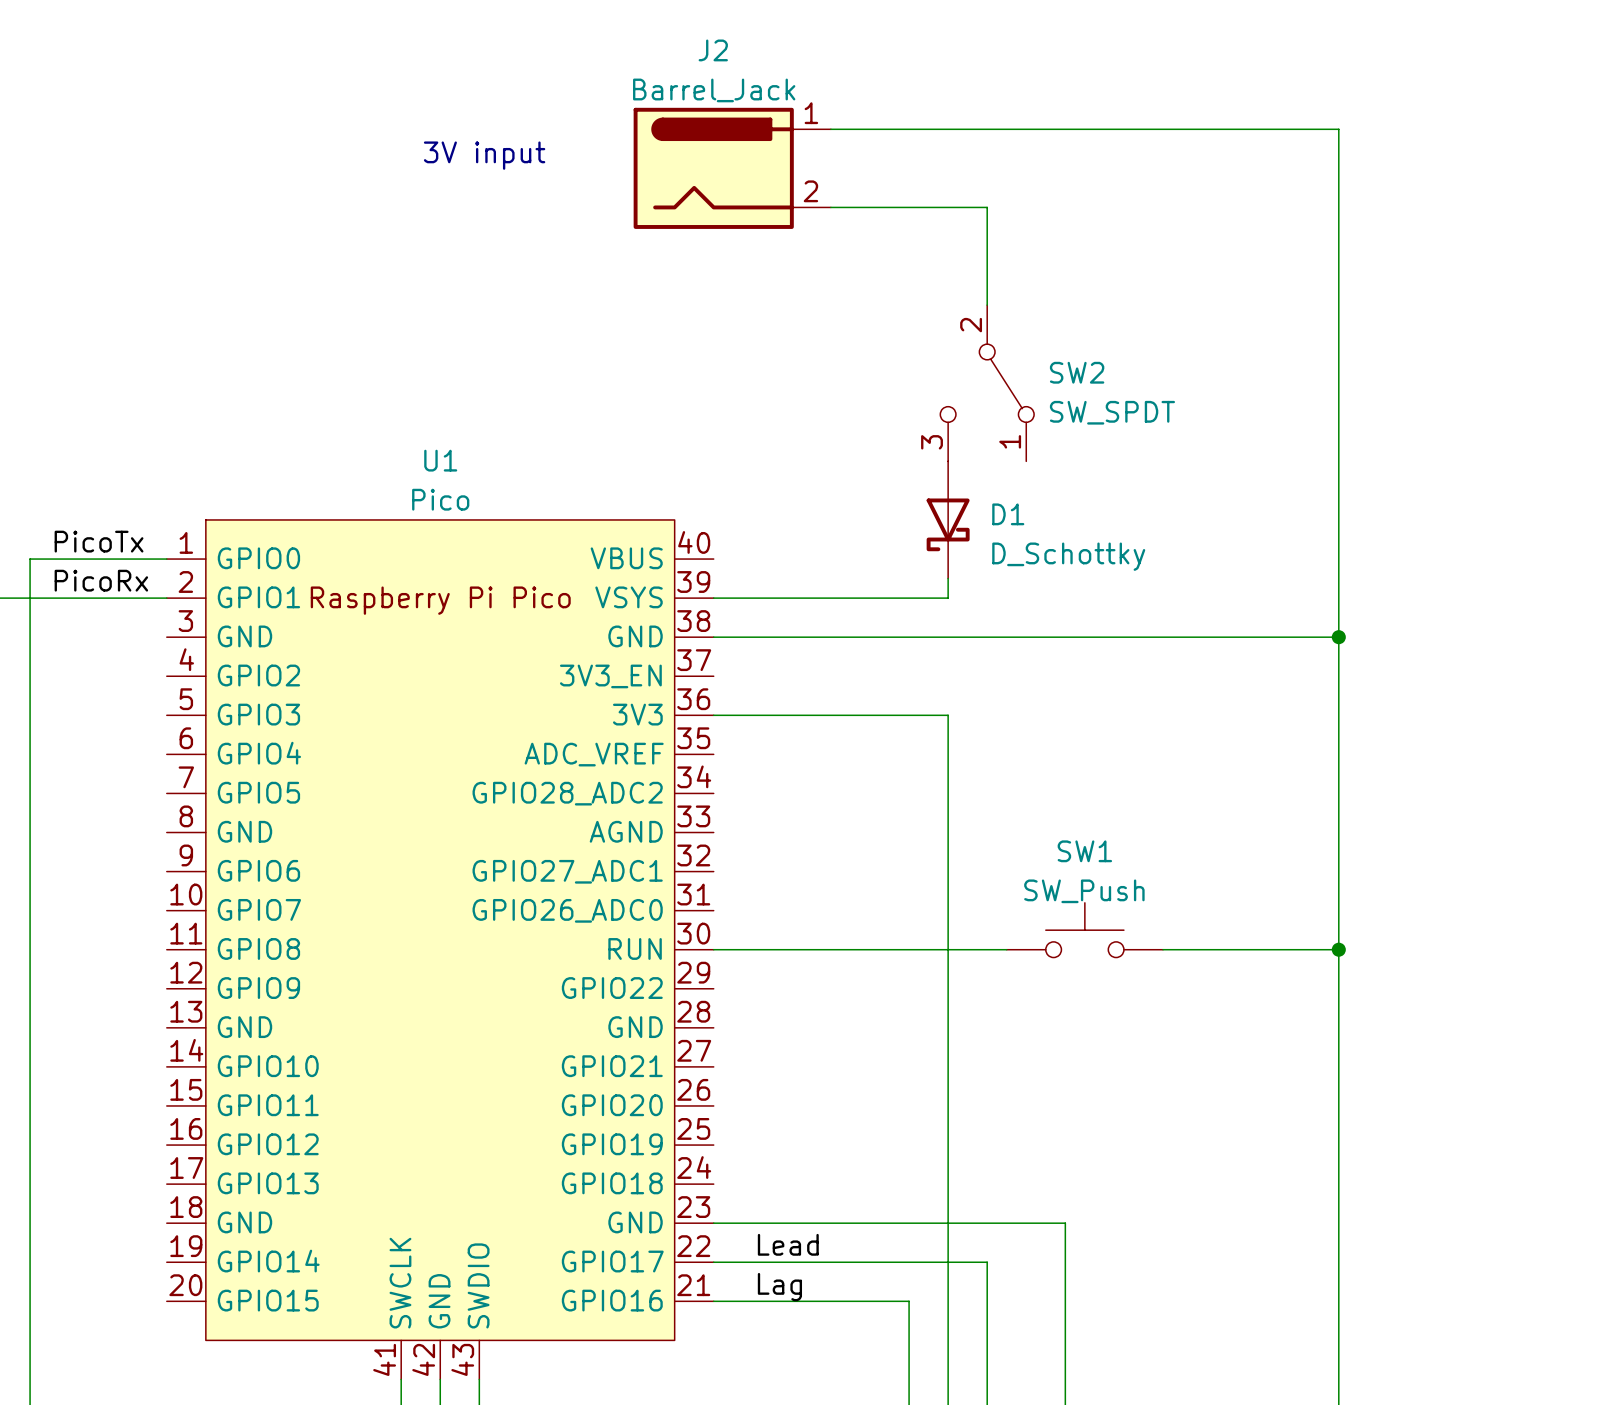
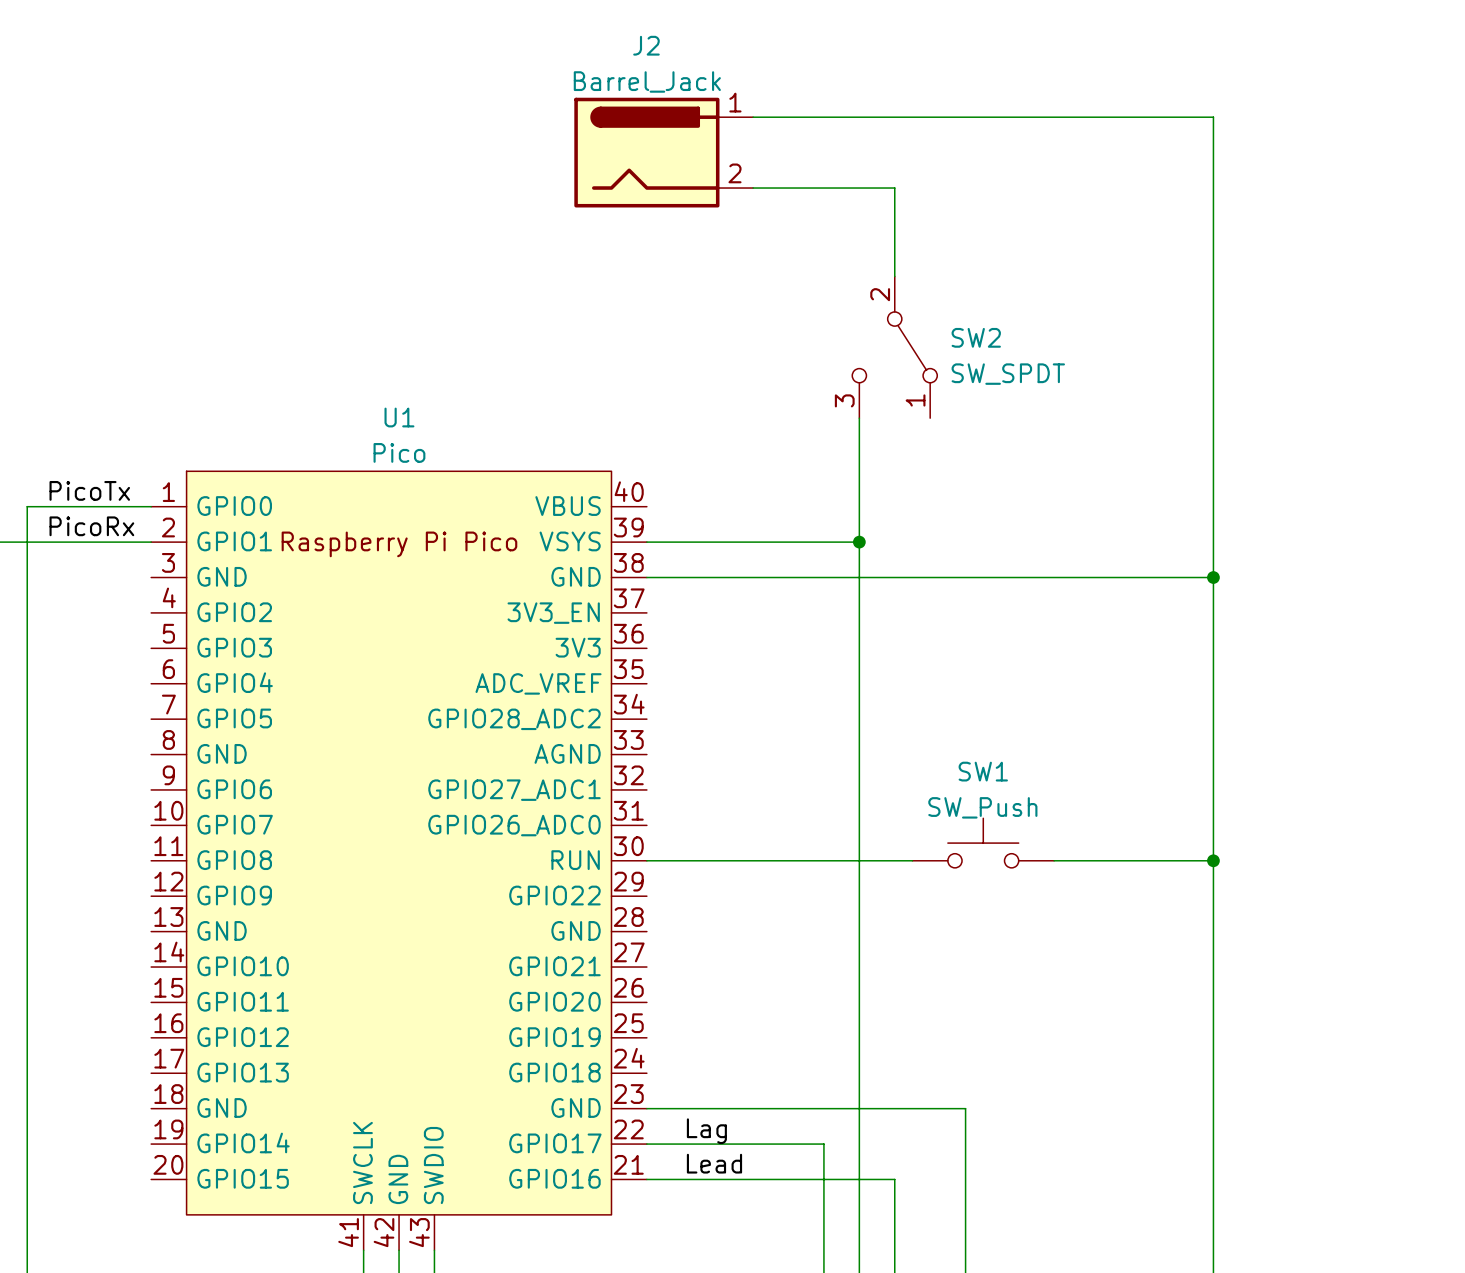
text: 3V input (484, 155) -> none
D1: D_Schottky (948, 519) -> none
junction: none -> (859, 542)
wire: (713, 715) (948, 715) -> (859, 542) (859, 648)
label: Lead (788, 1244) -> Lag (706, 1131)
wire: (909, 1262) (987, 1262) (987, 1301) -> (823, 1144) (823, 1179) (894, 1179)
label: Lag (779, 1287) -> Lead (714, 1163)

